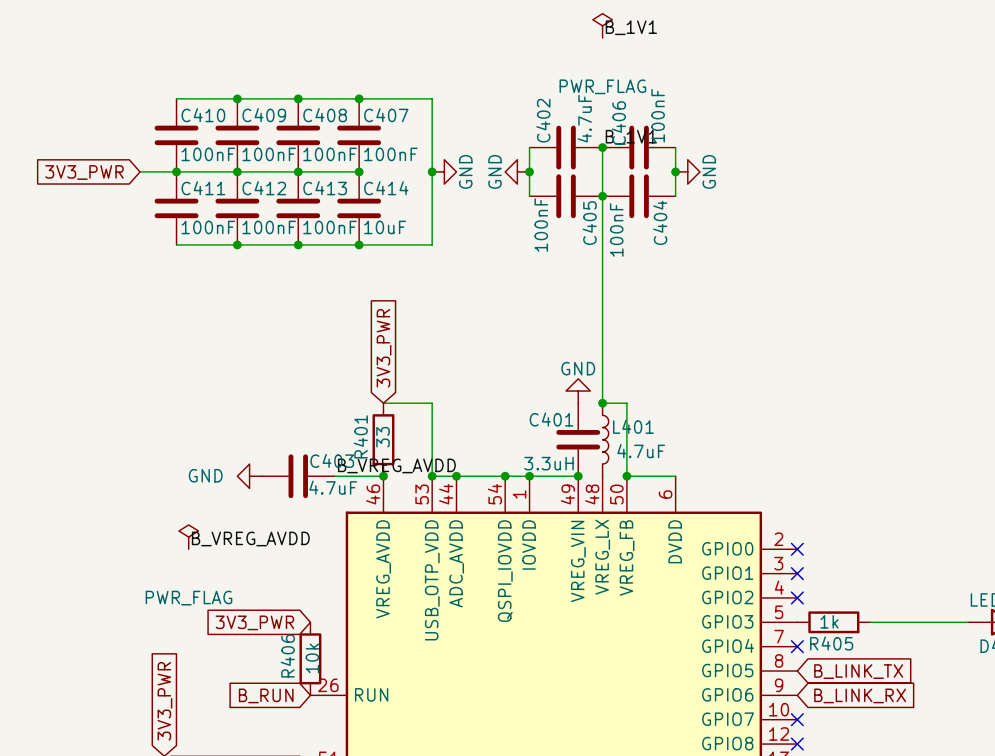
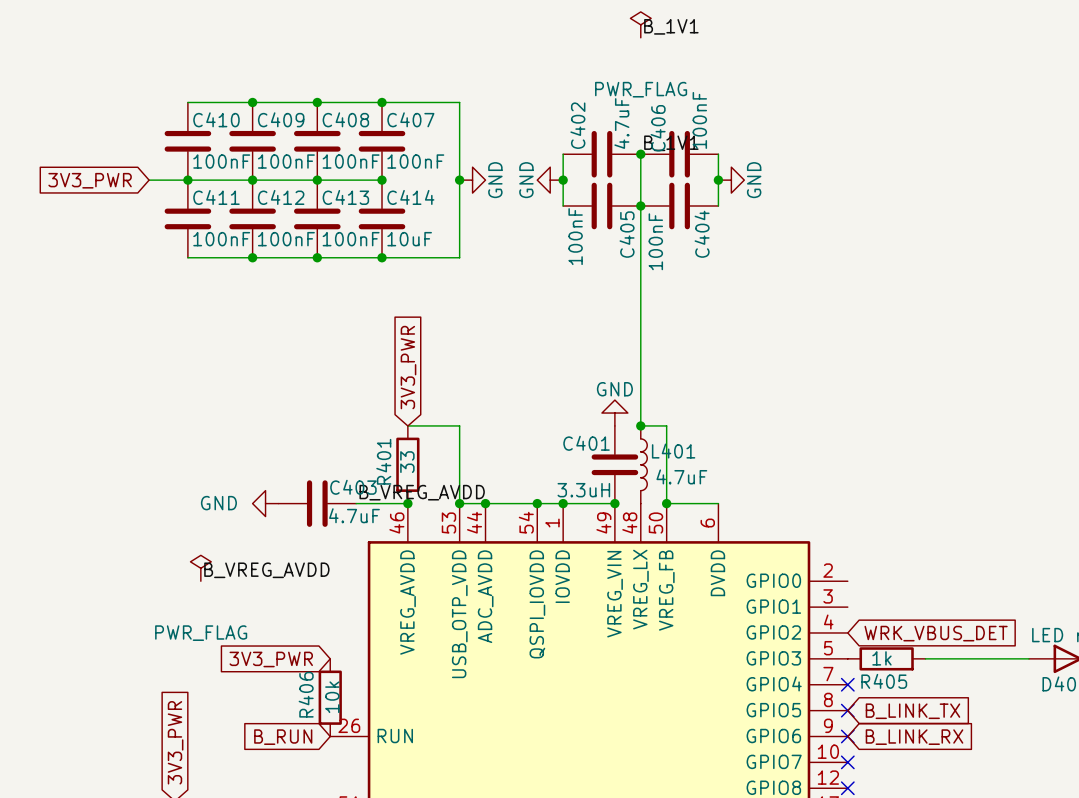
no-connect mark: (797, 549) -> none
no-connect mark: (797, 573) -> none
no-connect mark: (797, 597) -> none
global label: none -> WRK_VBUS_DET (936, 633)
no-connect mark: none -> (847, 710)
no-connect mark: none -> (847, 736)

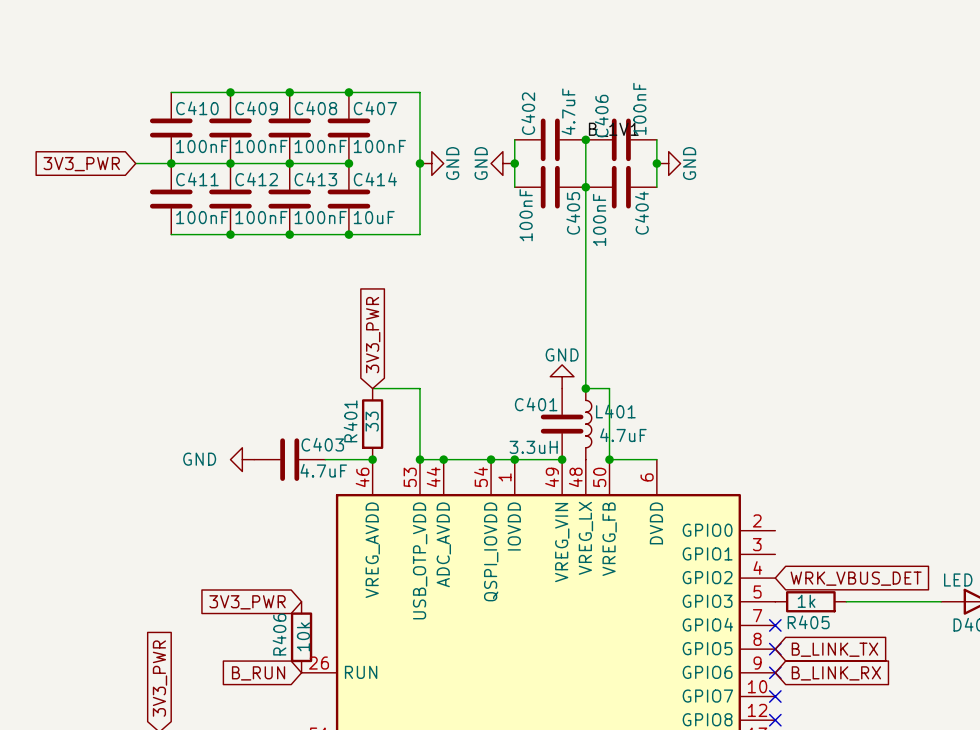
power symbol: PWR_FLAG (640, 24) -> none
label: B_1V1 (671, 26) -> none
label: B_VREG_AVDD (422, 492) -> none
power symbol: PWR_FLAG (200, 568) -> none
label: B_VREG_AVDD (266, 570) -> none

